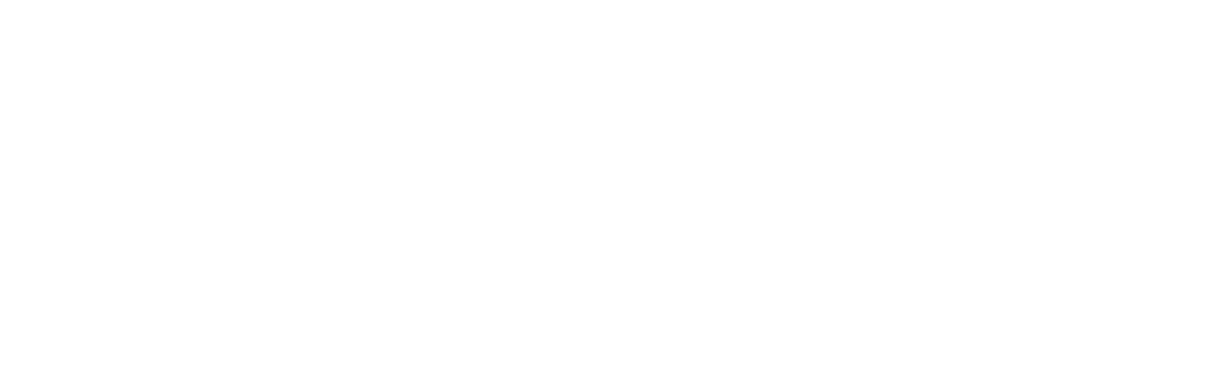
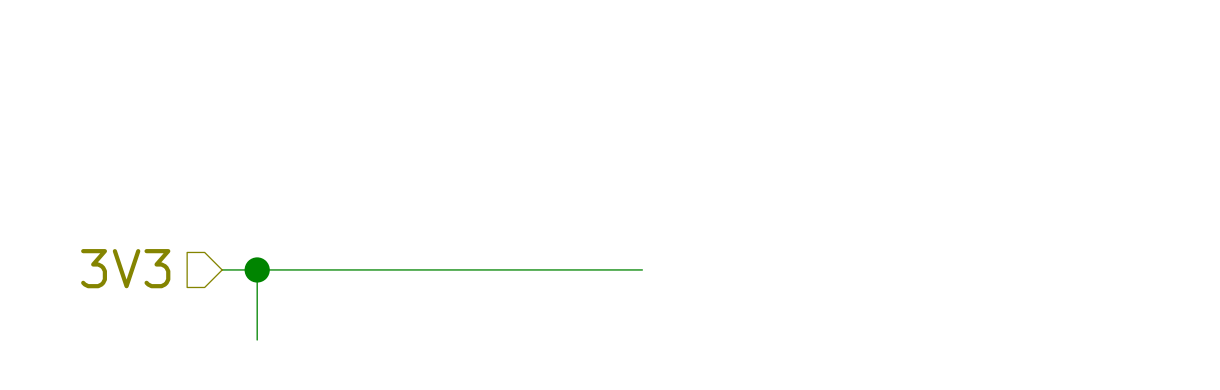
hierarchical label: none -> 3V3 (125, 268)
wire: none -> (222, 269) (642, 269)
wire: none -> (257, 269) (257, 340)
junction: none -> (257, 269)

